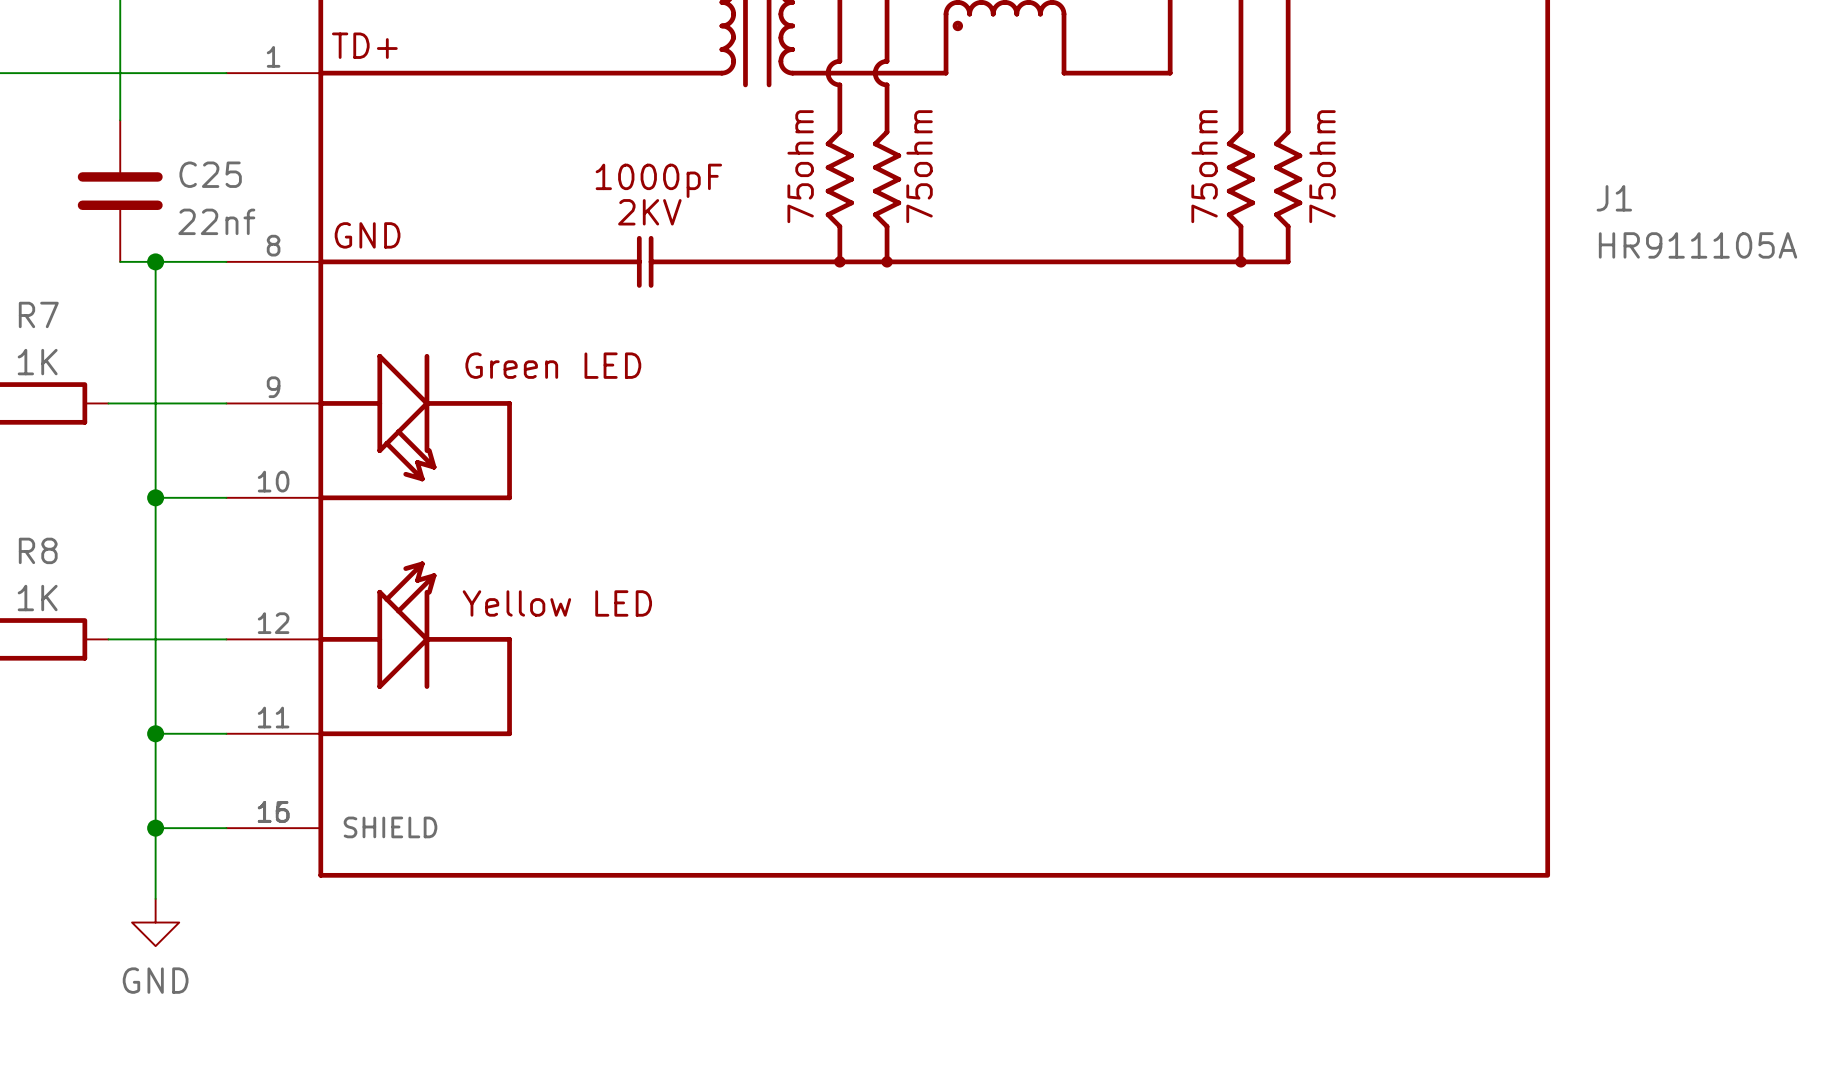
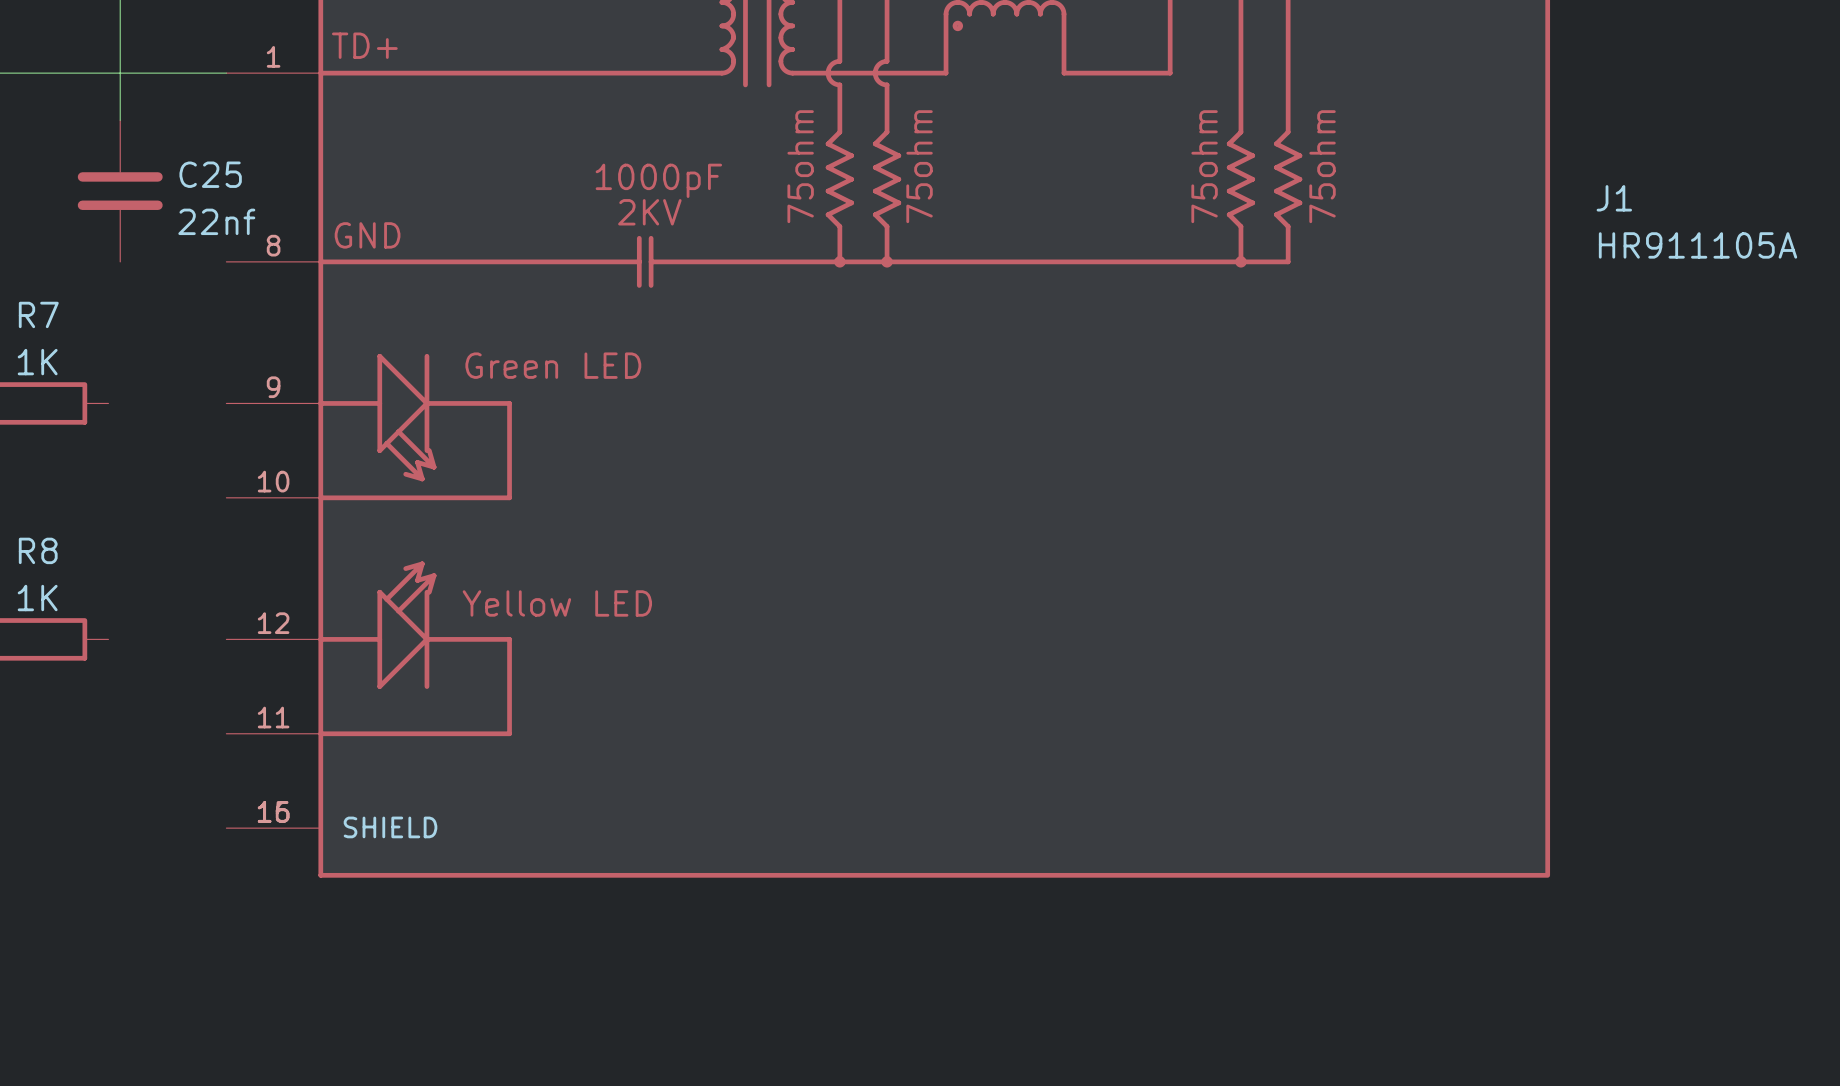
wire: (120, 261) (226, 261) -> none
wire: (155, 261) (155, 898) -> none
junction: (155, 261) -> none
wire: (108, 403) (226, 403) -> none
wire: (155, 497) (226, 497) -> none
junction: (155, 497) -> none
wire: (108, 639) (226, 639) -> none
wire: (155, 733) (226, 733) -> none
junction: (155, 733) -> none
wire: (155, 828) (226, 828) -> none
junction: (155, 828) -> none
power symbol: GND (155, 922) -> none

